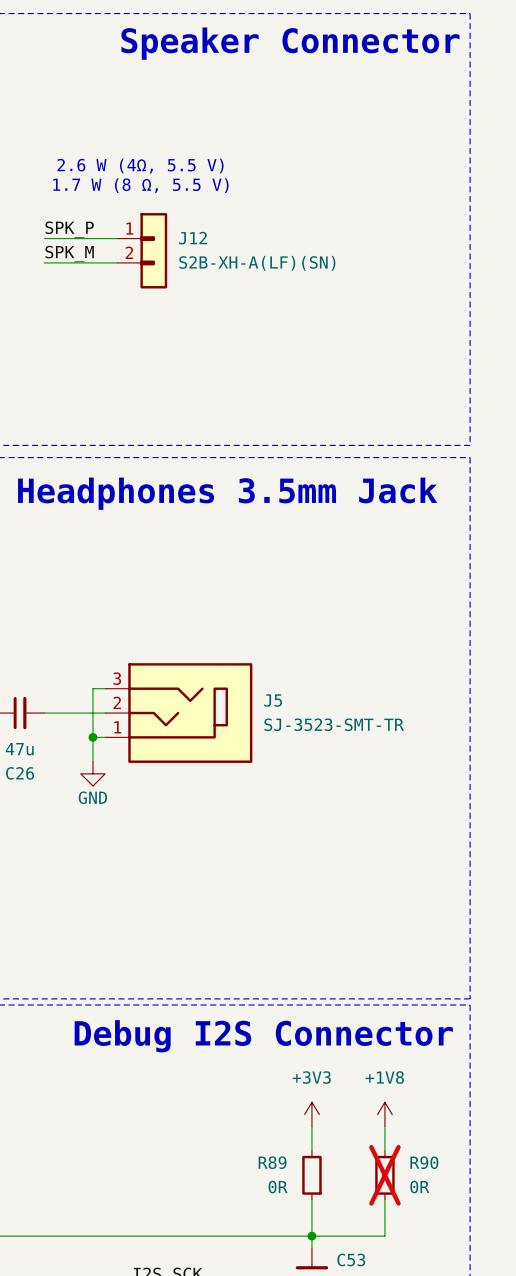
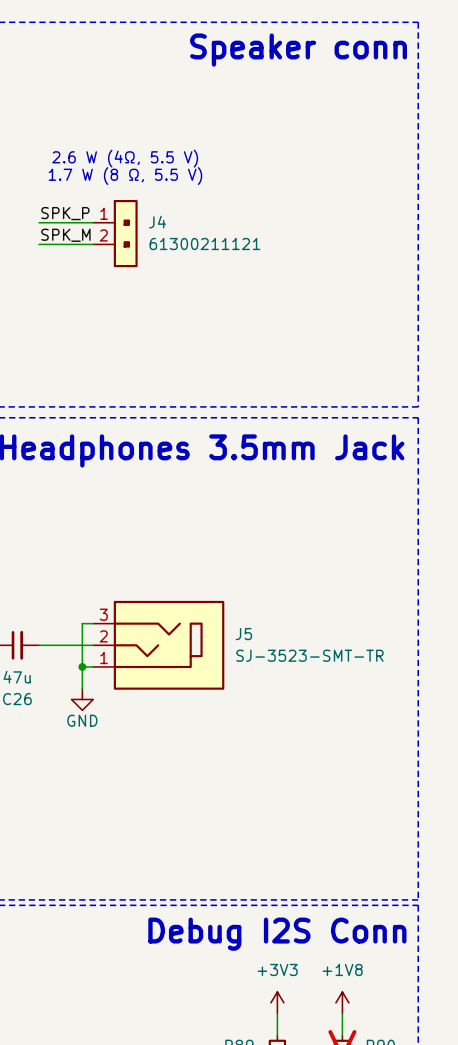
text: Speaker Connector (290, 43) -> Speaker conn (298, 50)
J4: none -> (115, 233)
J12: (142, 250) -> none
text: Debug I2S Connector (263, 1036) -> Debug I2S Conn (277, 934)

